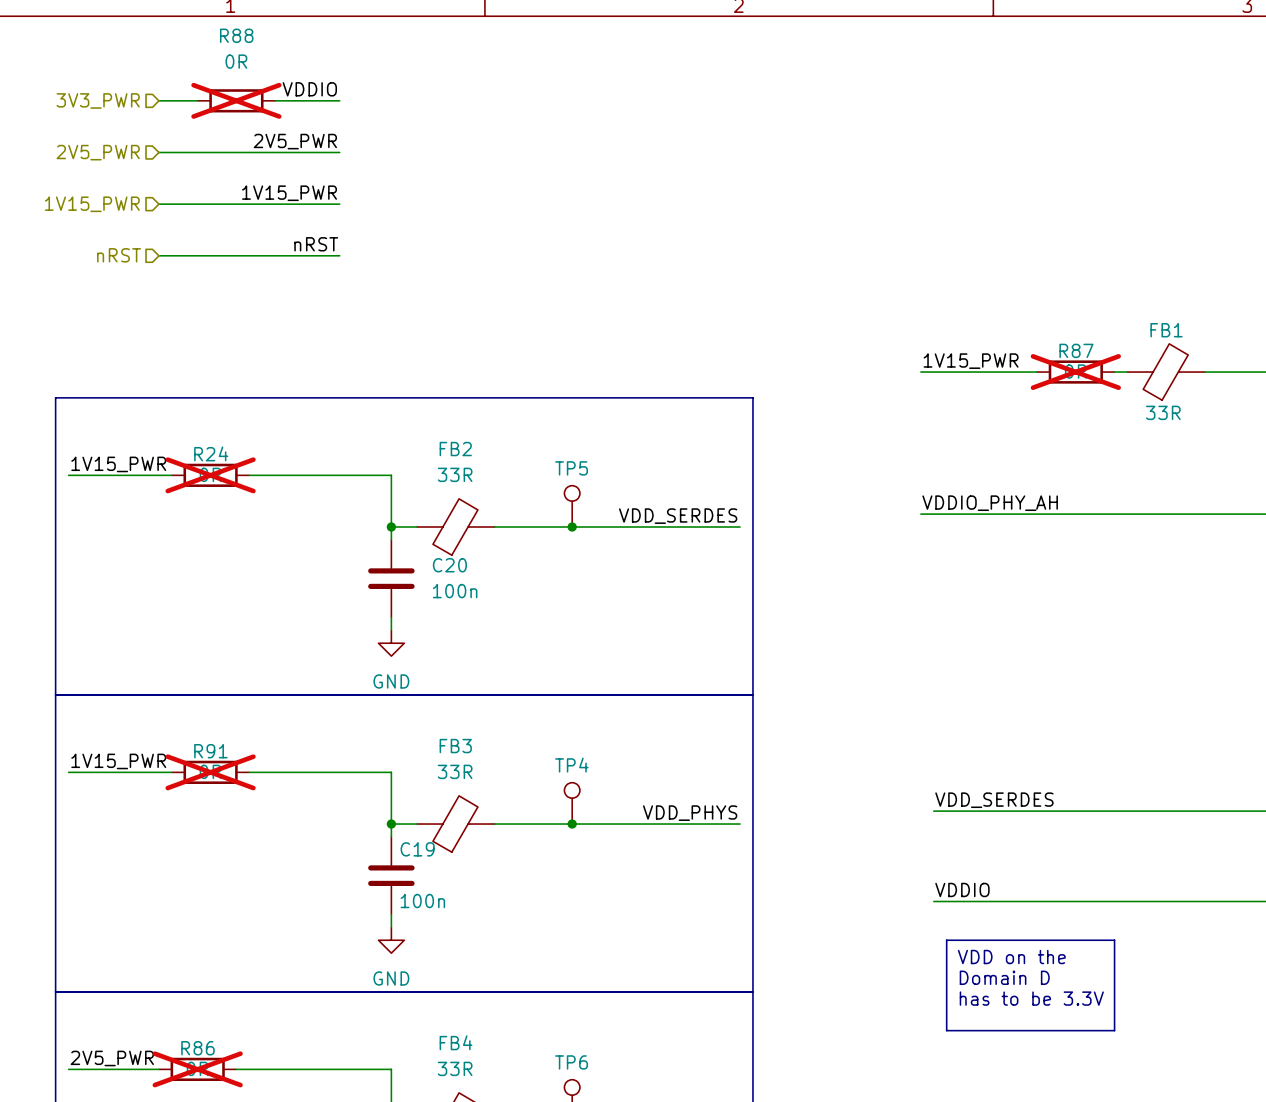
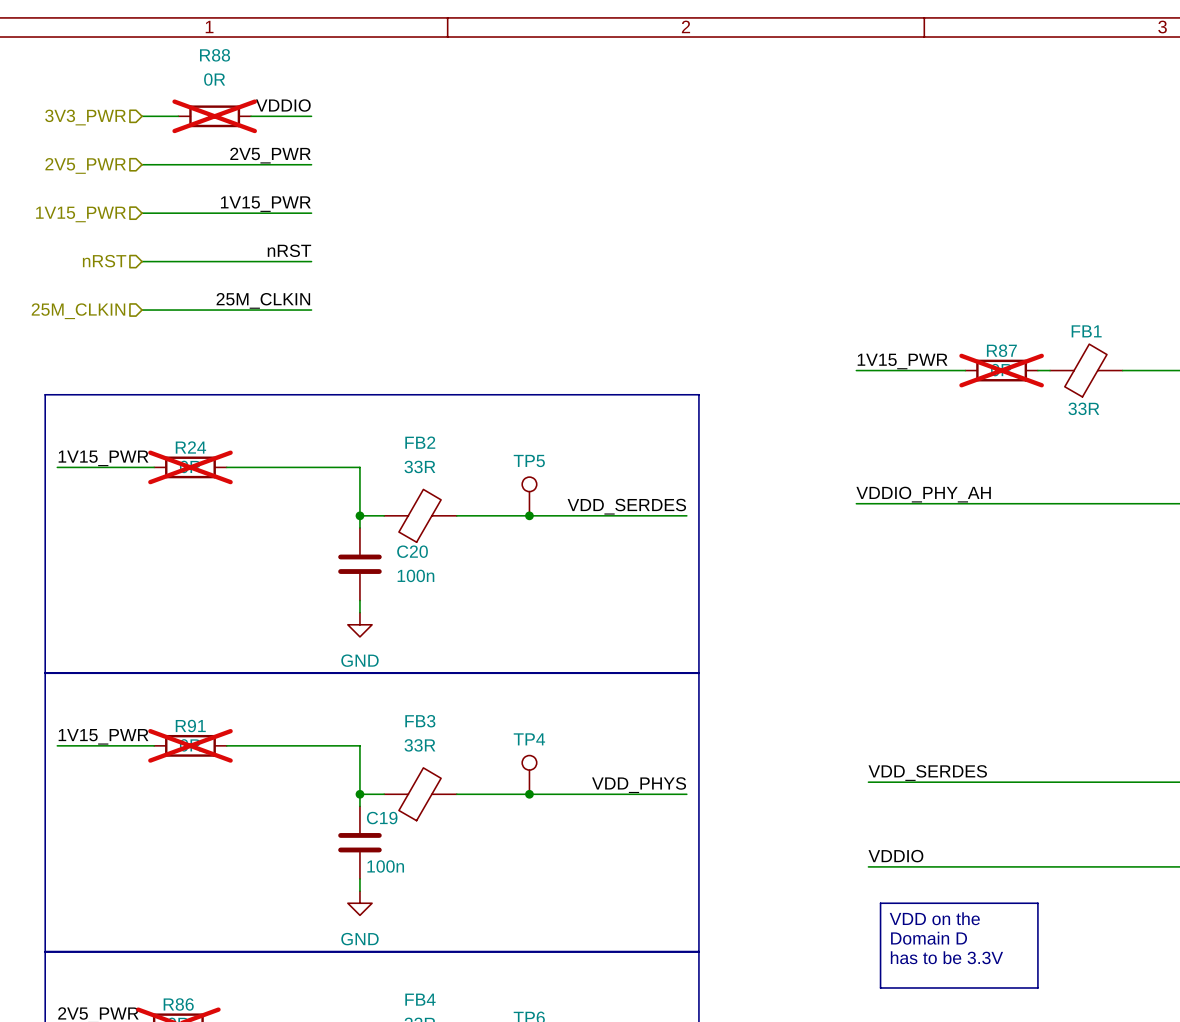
label: none -> 25M_CLKIN (263, 300)
hierarchical label: none -> 25M_CLKIN (78, 311)
wire: none -> (142, 310) (311, 310)

